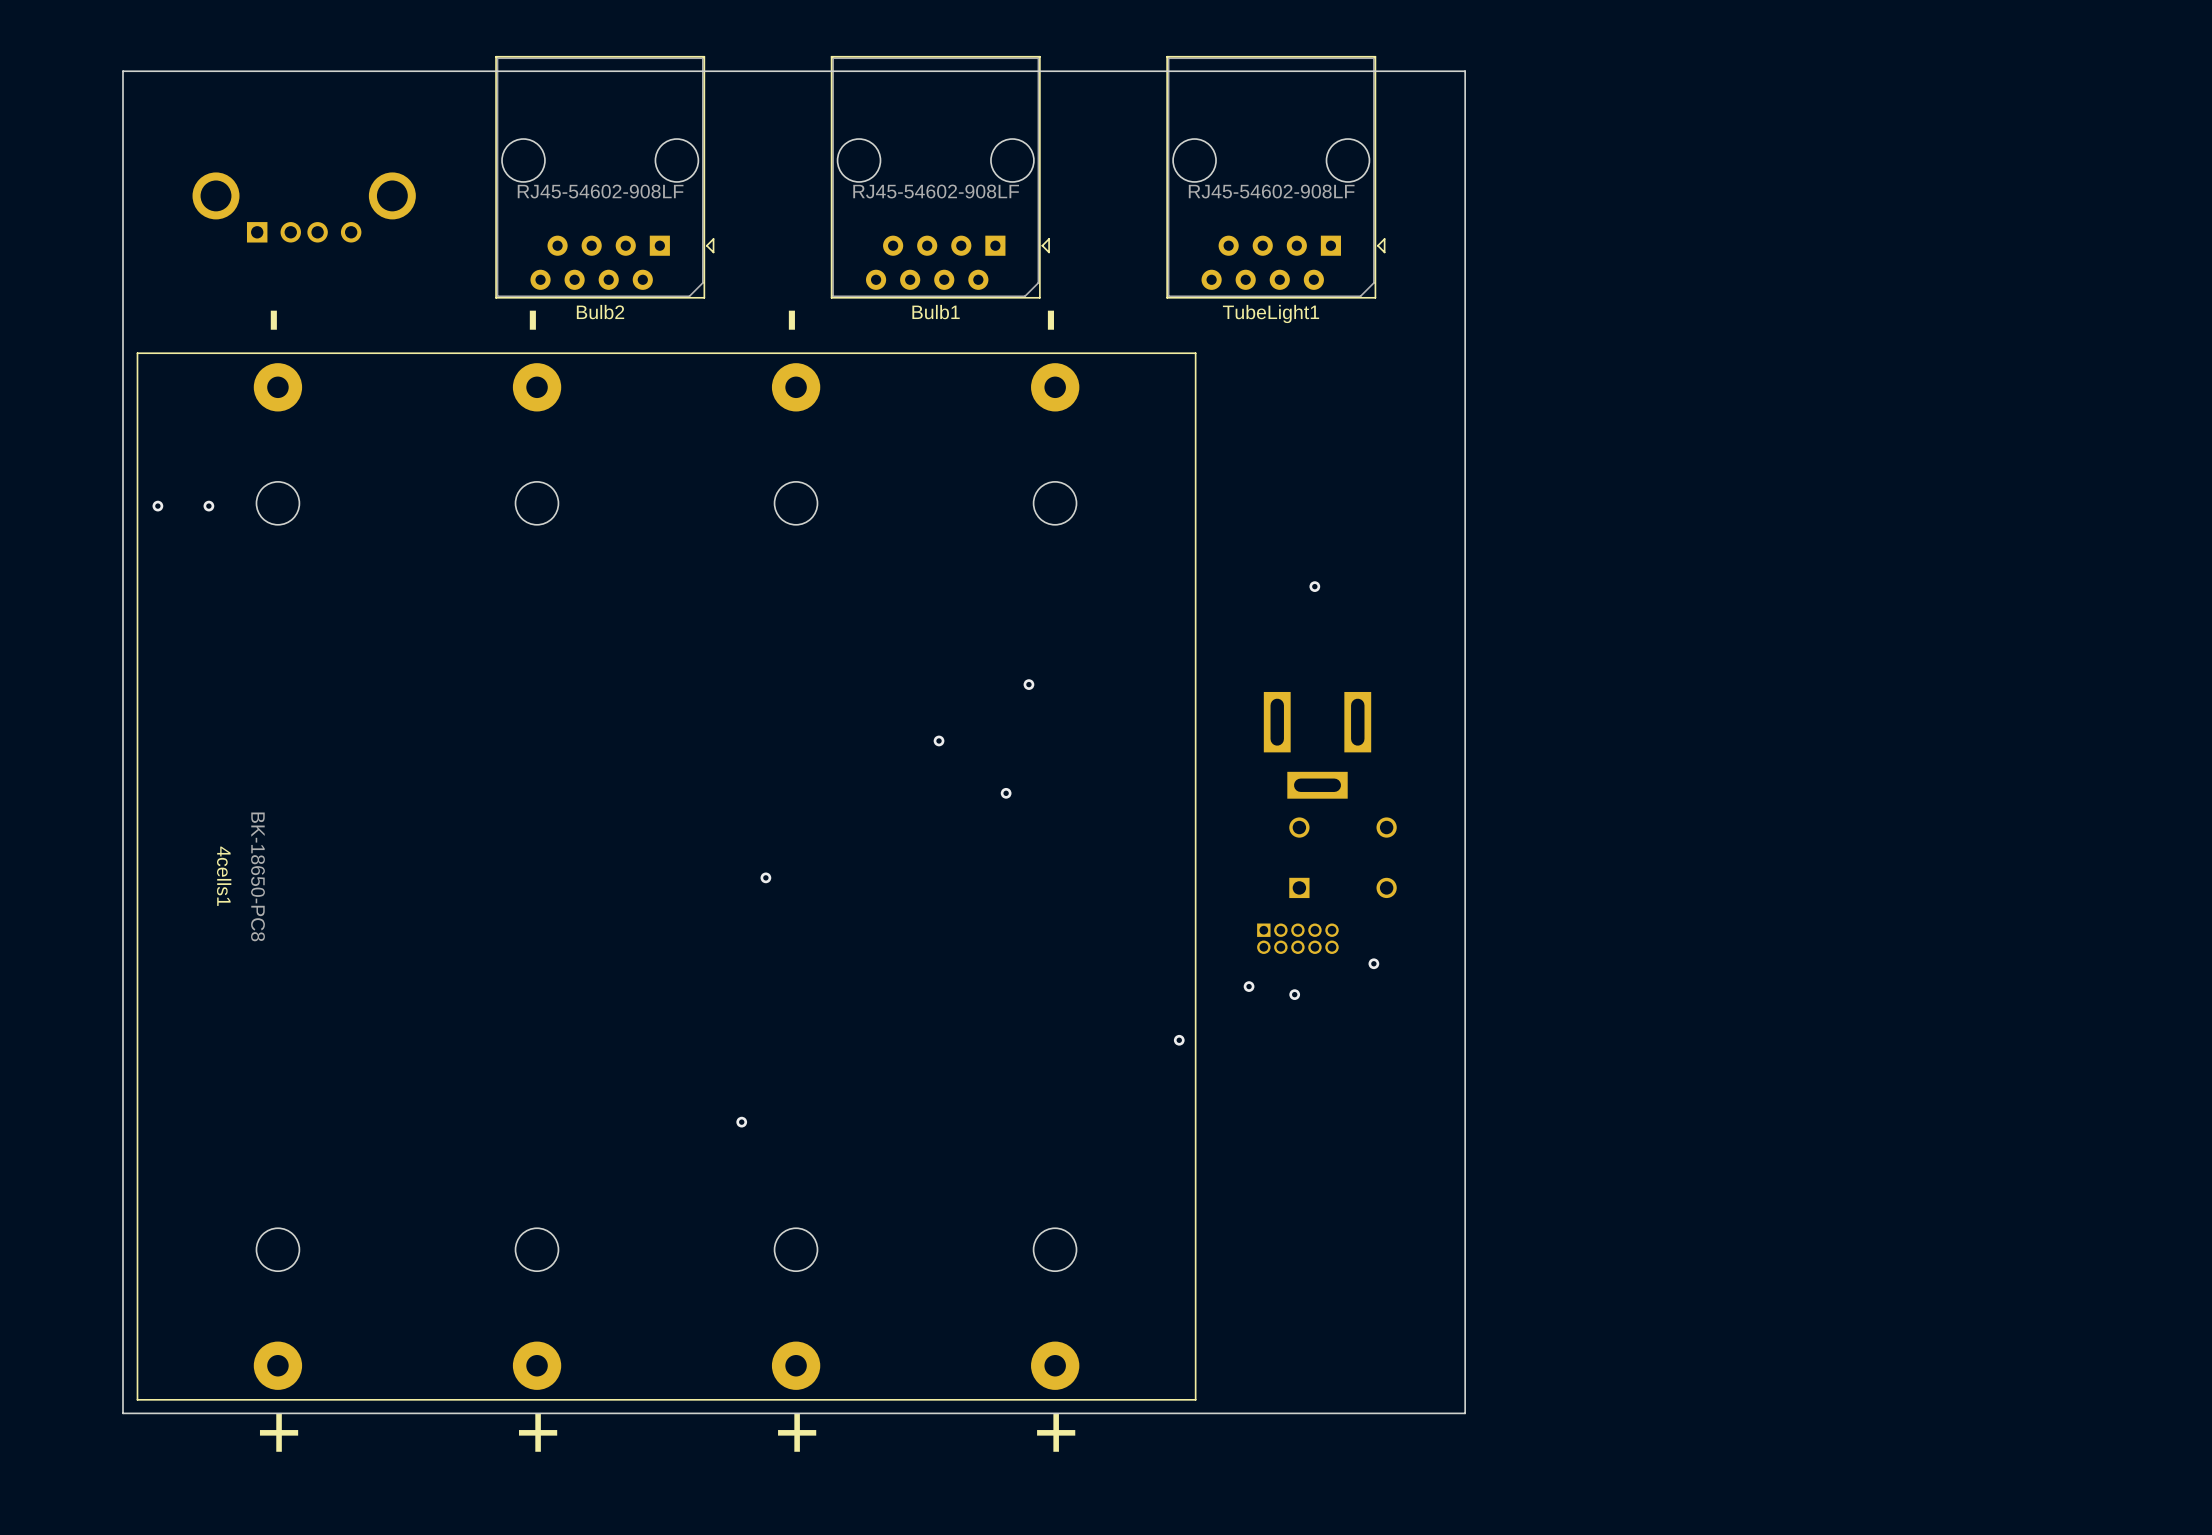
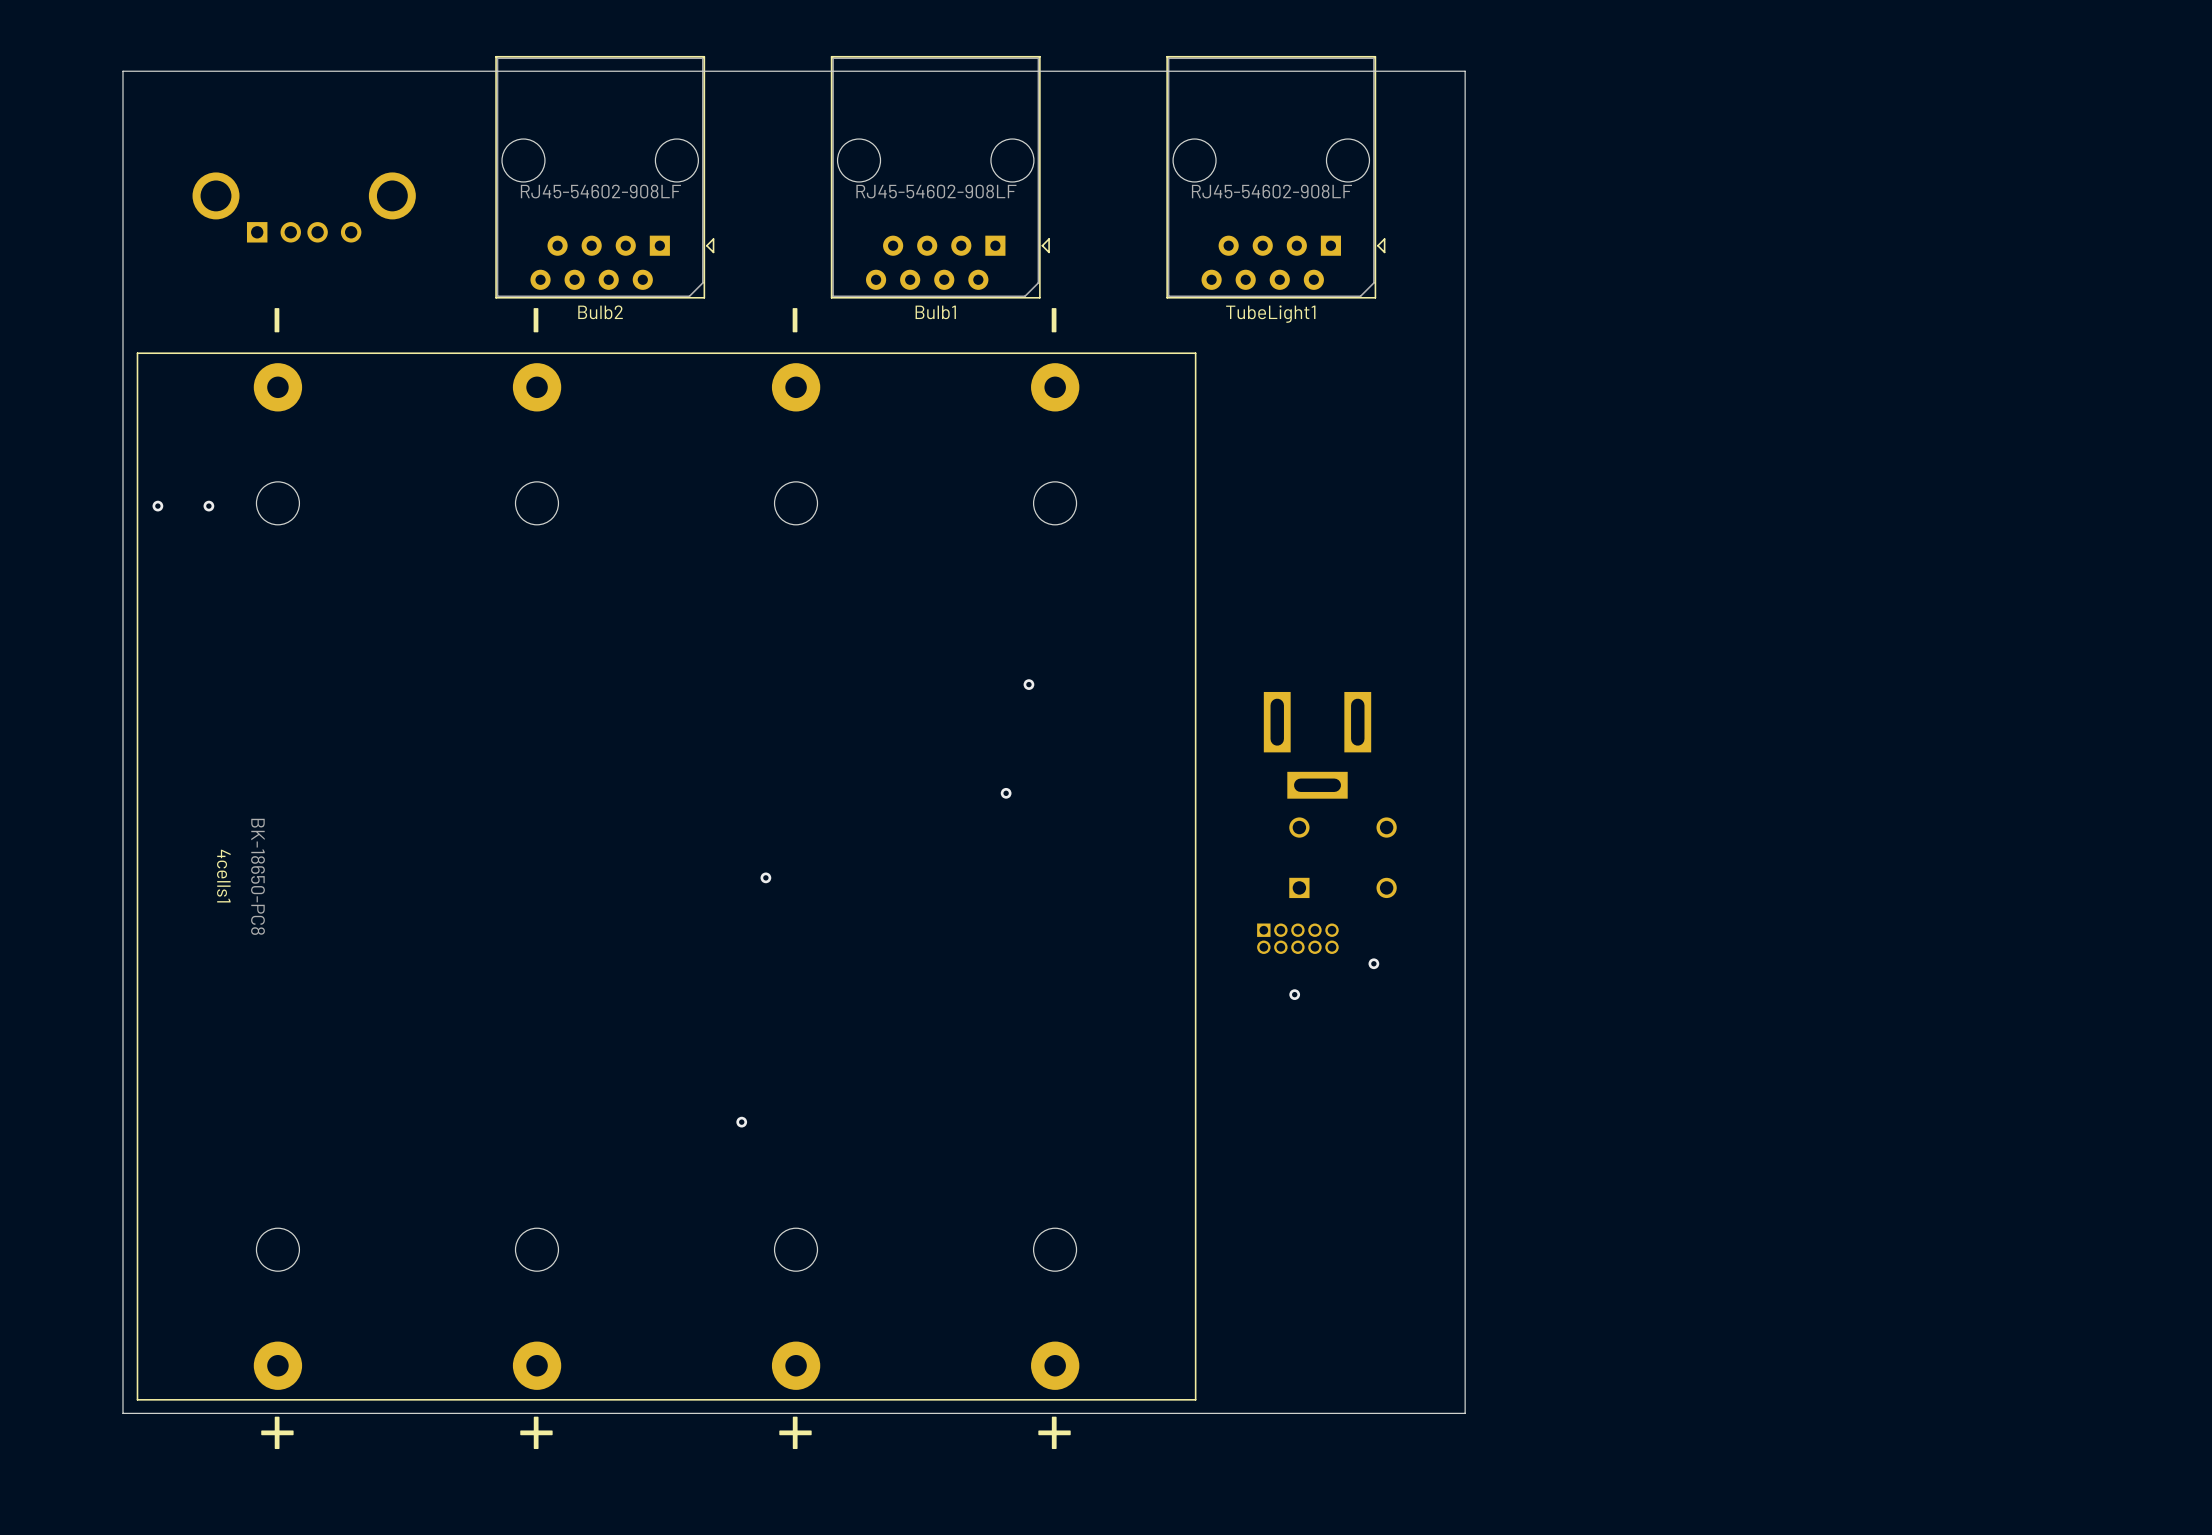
via: (1314, 586) -> none
via: (939, 740) -> none
via: (1249, 986) -> none
via: (1179, 1040) -> none

